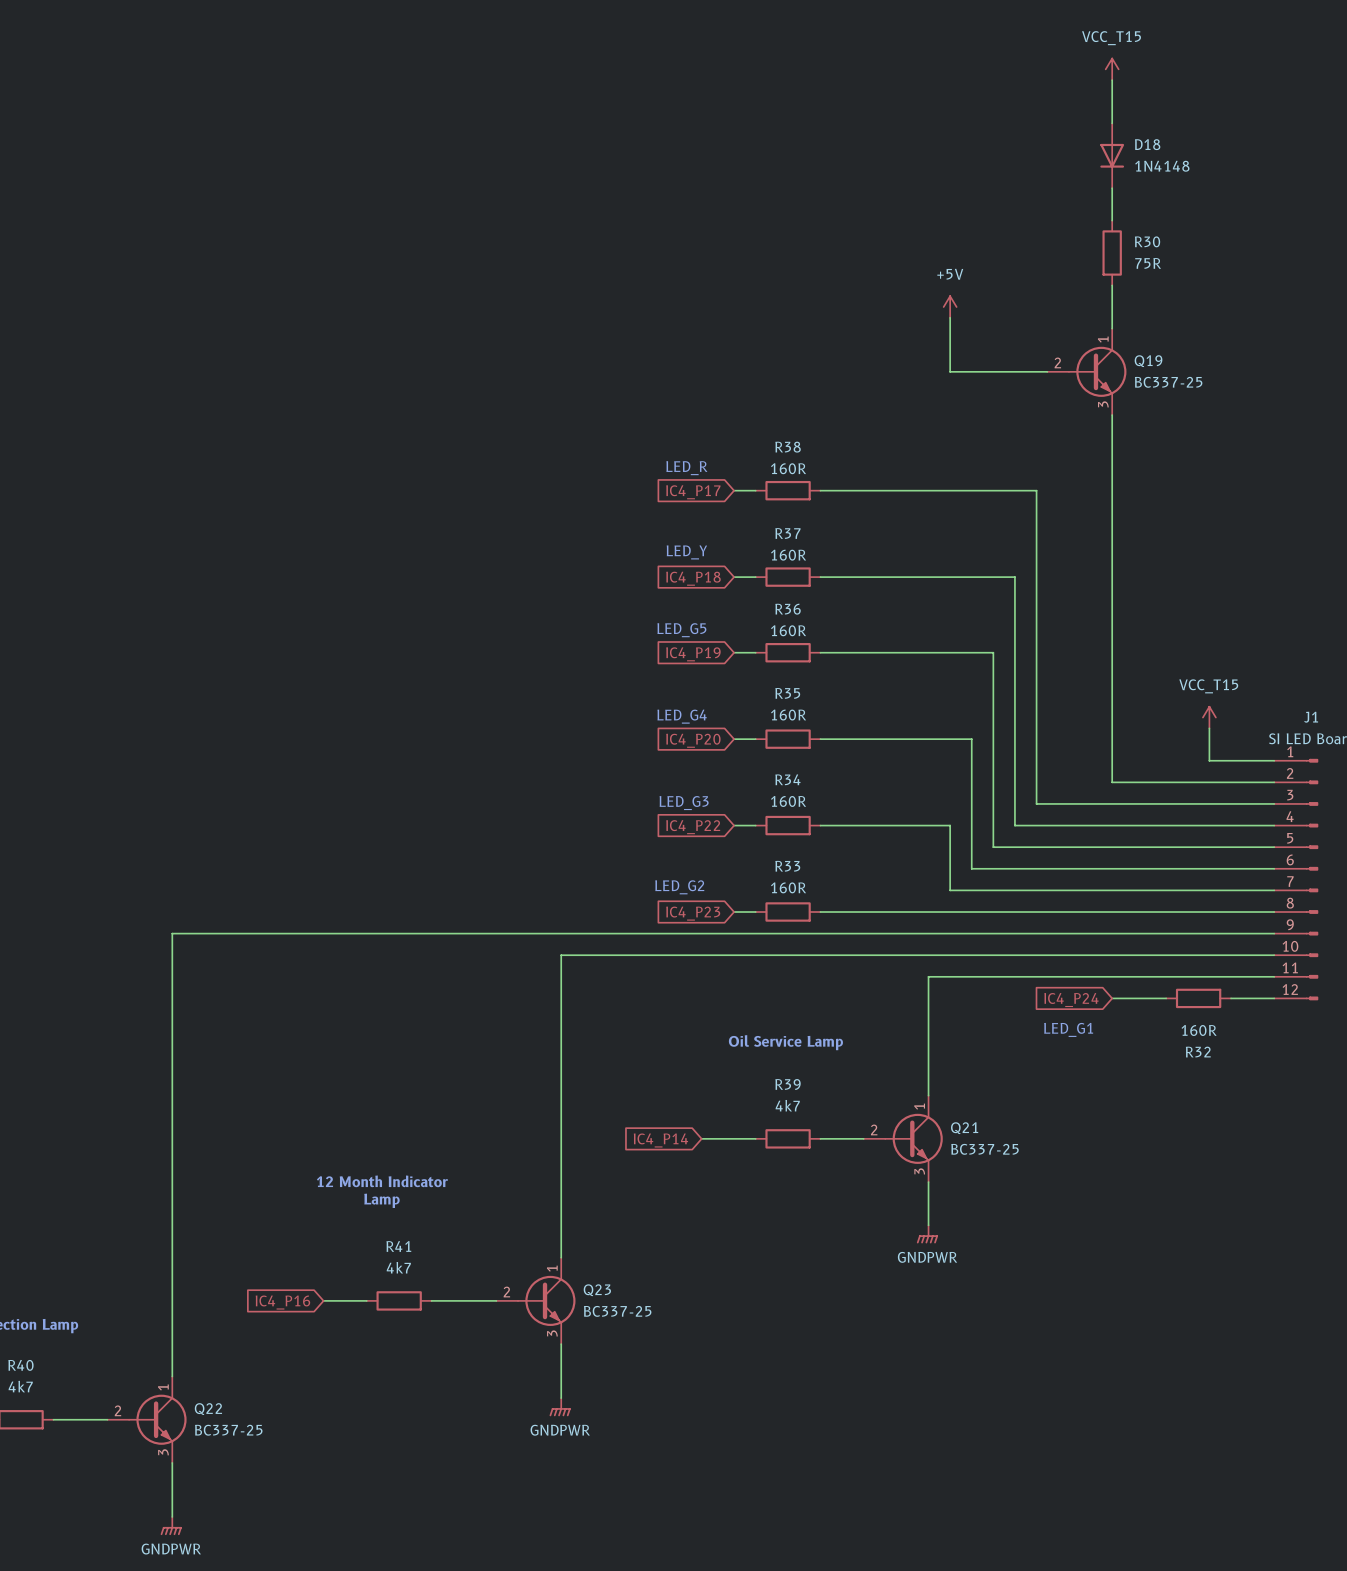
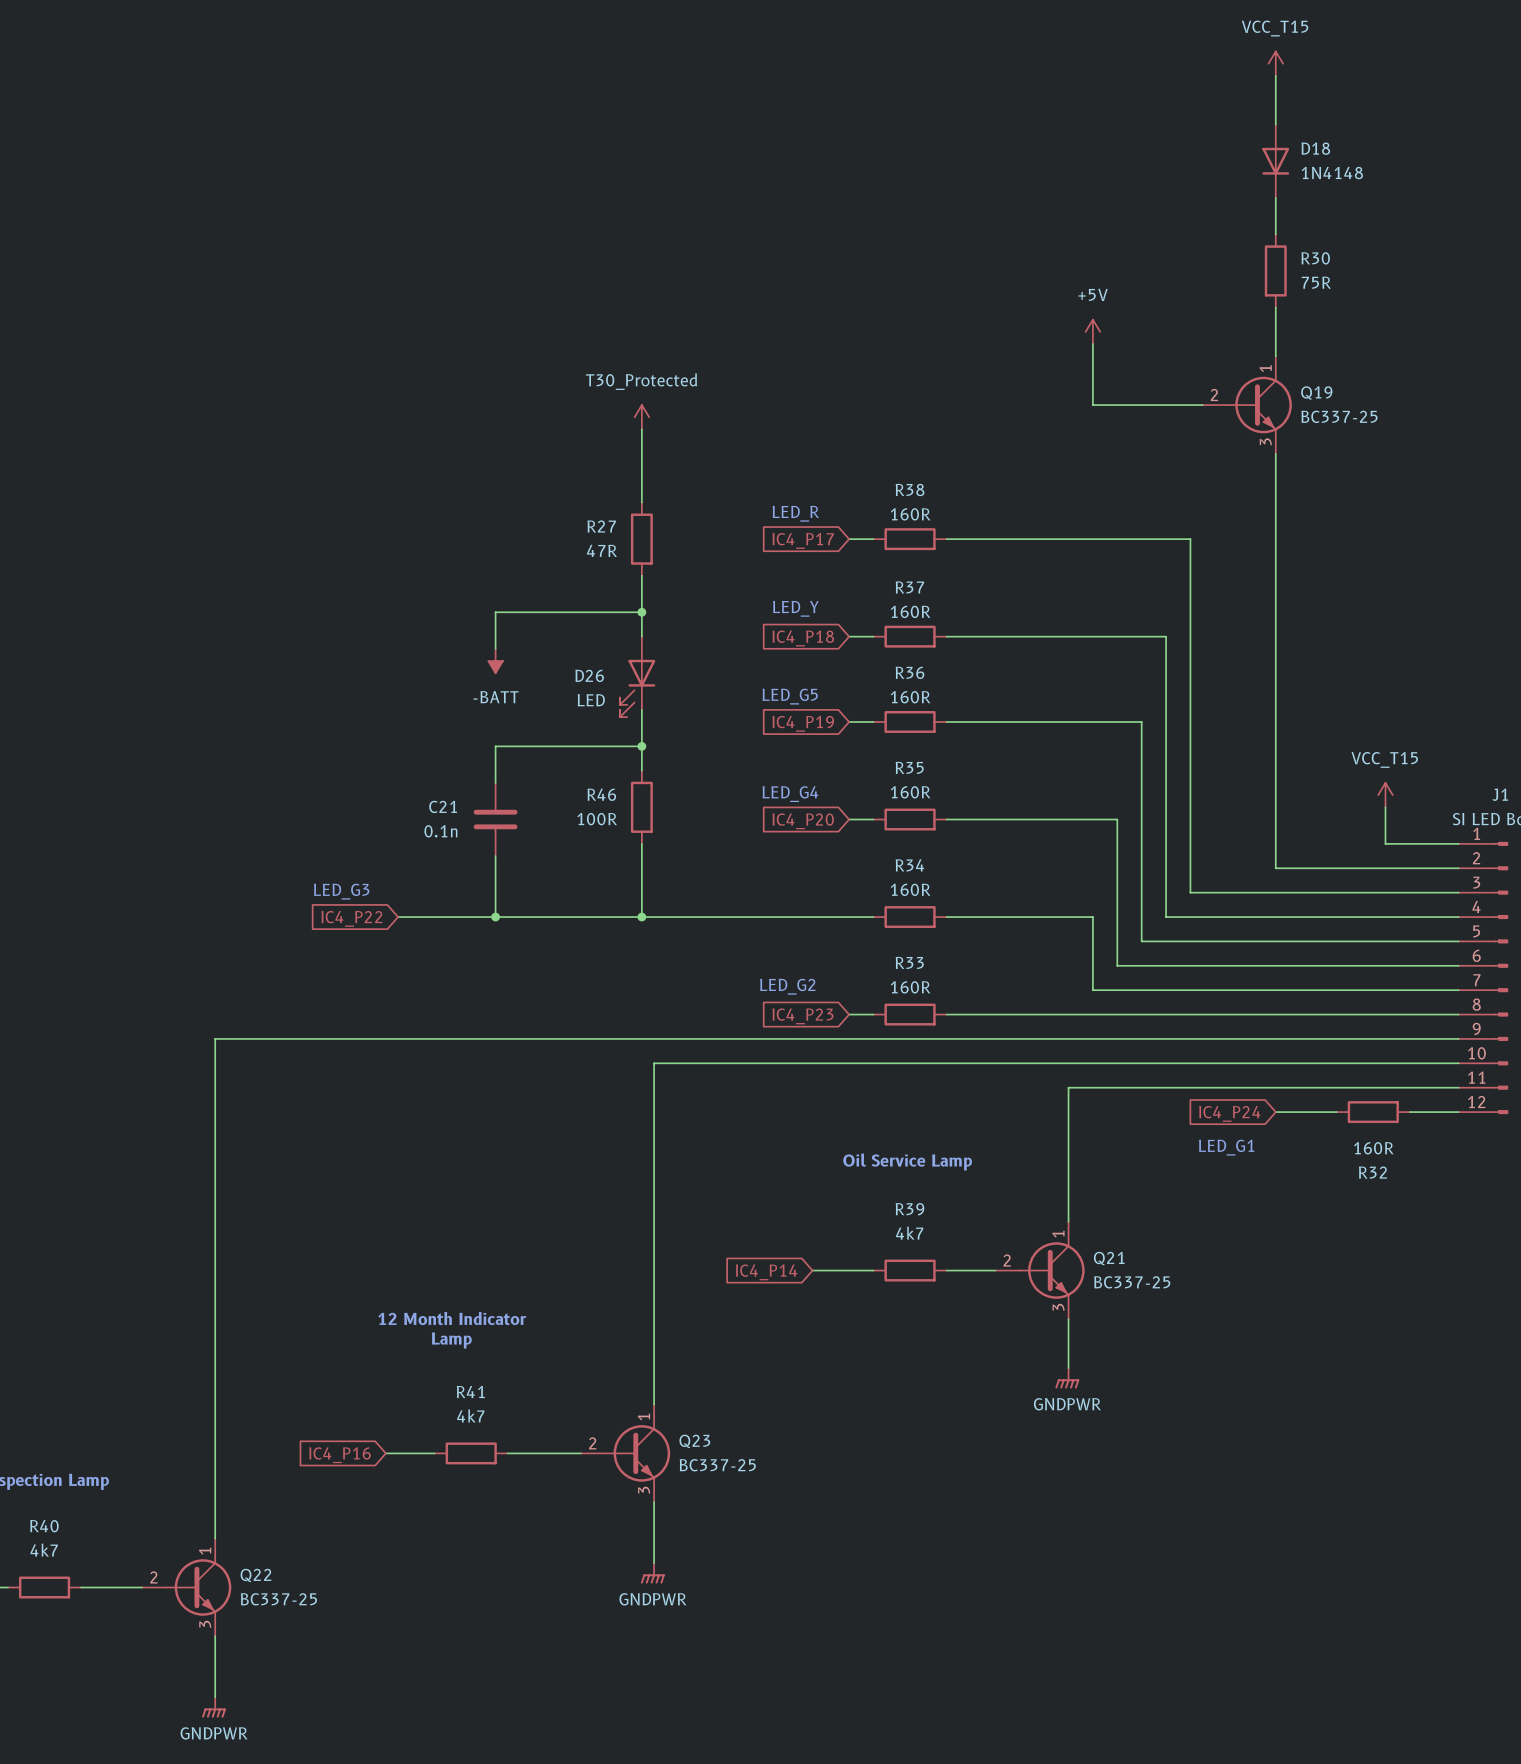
power symbol: none -> T30_Protected (641, 417)
wire: none -> (641, 429) (641, 502)
R27: none -> 47R (641, 539)
wire: none -> (641, 575) (641, 636)
wire: none -> (641, 612) (495, 612) (495, 648)
junction: none -> (641, 612)
power symbol: none -> -BATT (495, 661)
D26: none -> LED (637, 676)
wire: none -> (641, 709) (641, 770)
wire: none -> (641, 746) (495, 746) (495, 782)
junction: none -> (641, 746)
R46: none -> 100R (641, 807)
C21: none -> 0.1n (495, 819)
wire: none -> (641, 843) (641, 917)
wire: none -> (495, 856) (495, 917)
text: none -> LED_G3 (341, 891)
text: LED_G3 (684, 803) -> none
wire: none -> (398, 917) (849, 917)
junction: none -> (495, 917)
junction: none -> (641, 917)
global label: none -> IC4_P22 (351, 918)
global label: IC4_P22 (693, 827) -> none

